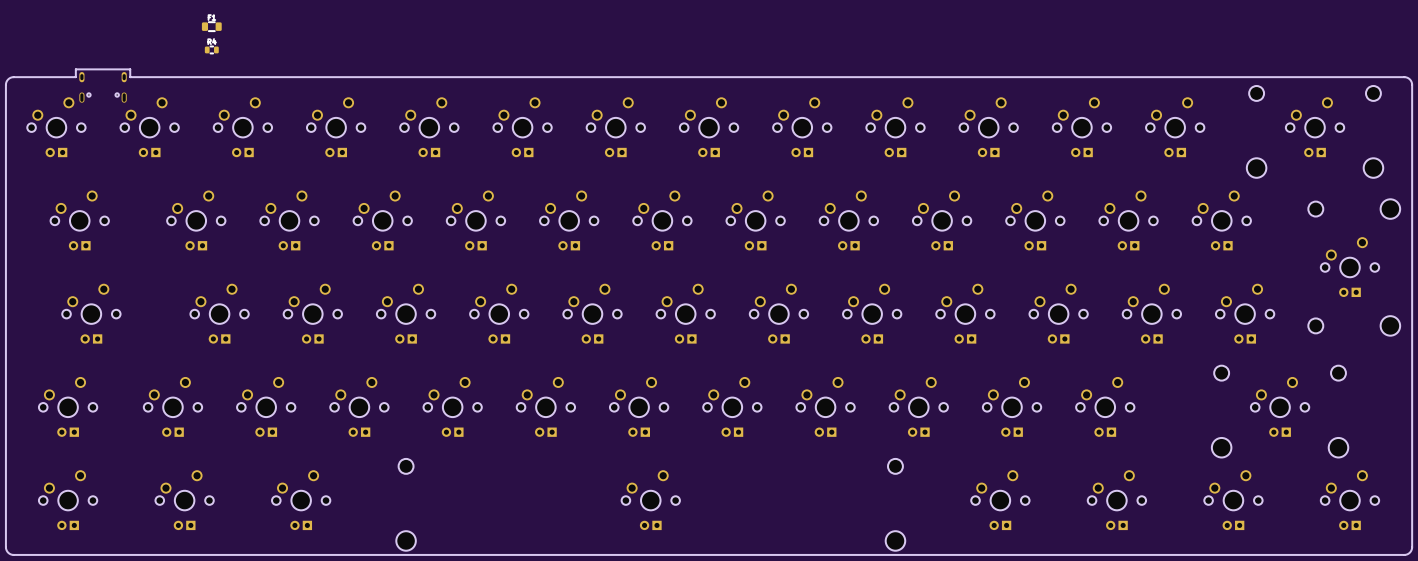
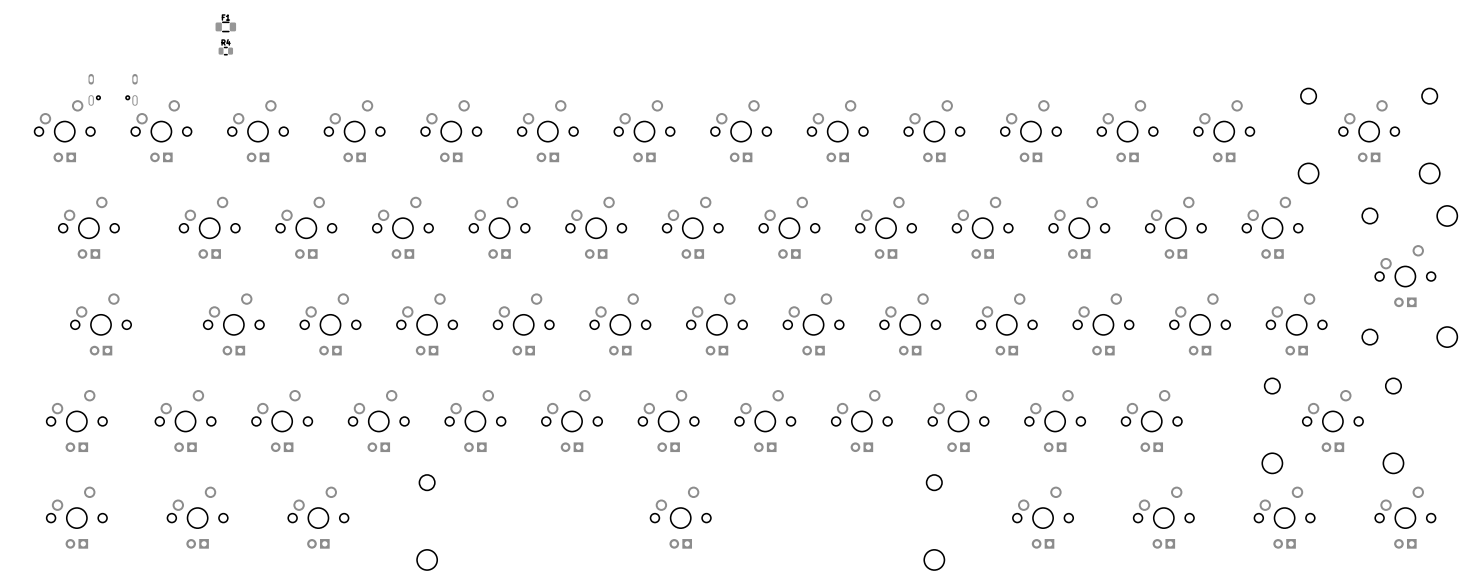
board edge: (75, 69) (130, 69) (130, 77) (1407, 77) (1412, 84) (1411, 550) (1404, 554) (10, 554) (5, 547) (6, 83) (8, 79) (12, 77) (75, 77) (75, 69) -> none

